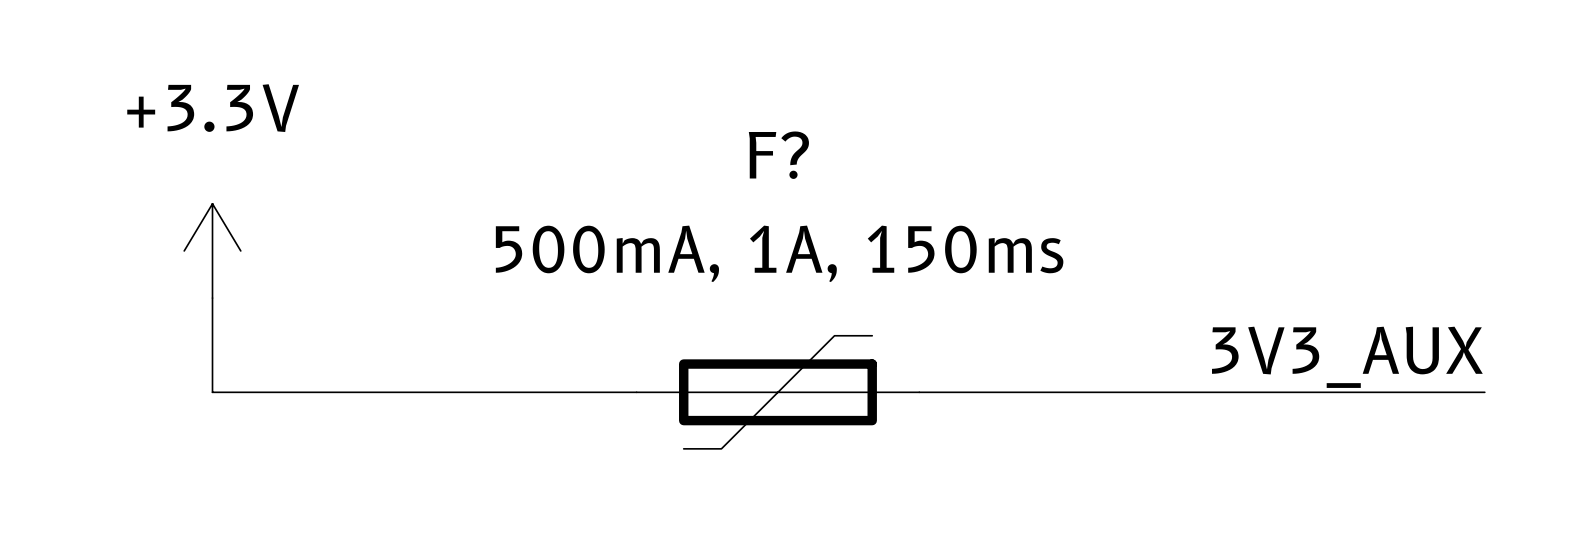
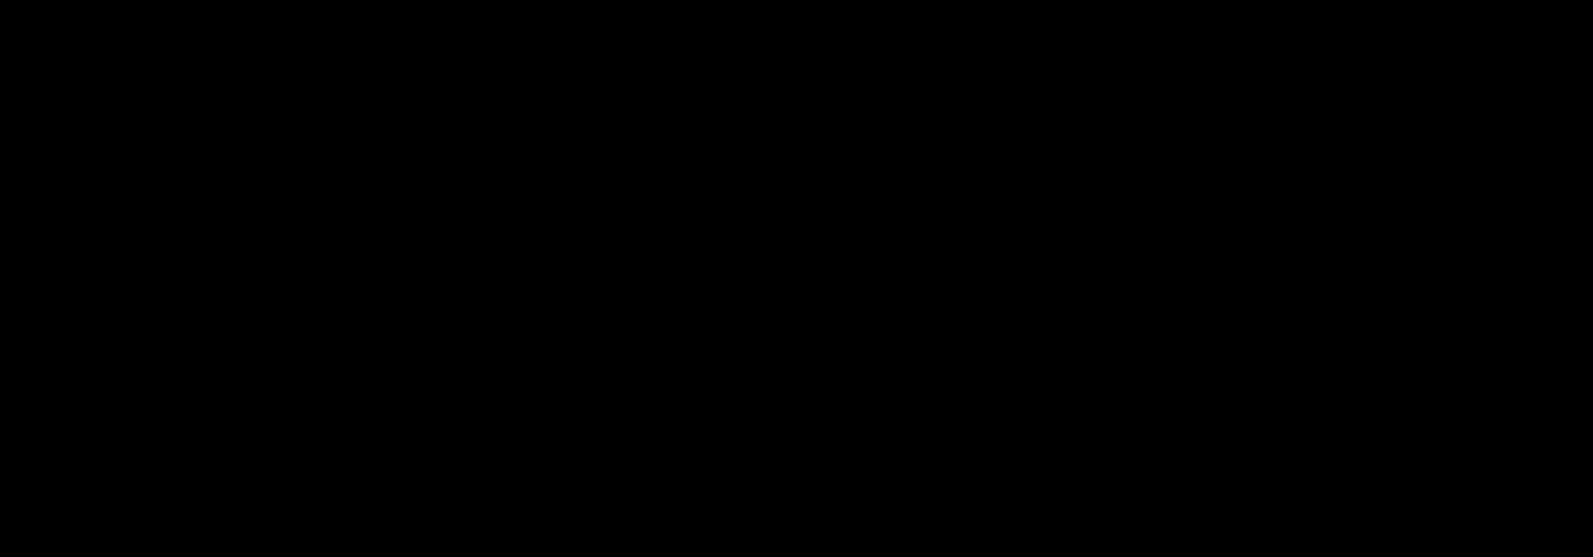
power symbol: +3.3V (212, 250) -> none
wire: (212, 298) (212, 392) (636, 392) -> none
label: 3V3_AUX (1347, 357) -> none
F?: 500mA, 1A, 150ms (777, 392) -> none
wire: (919, 392) (1484, 392) -> none

